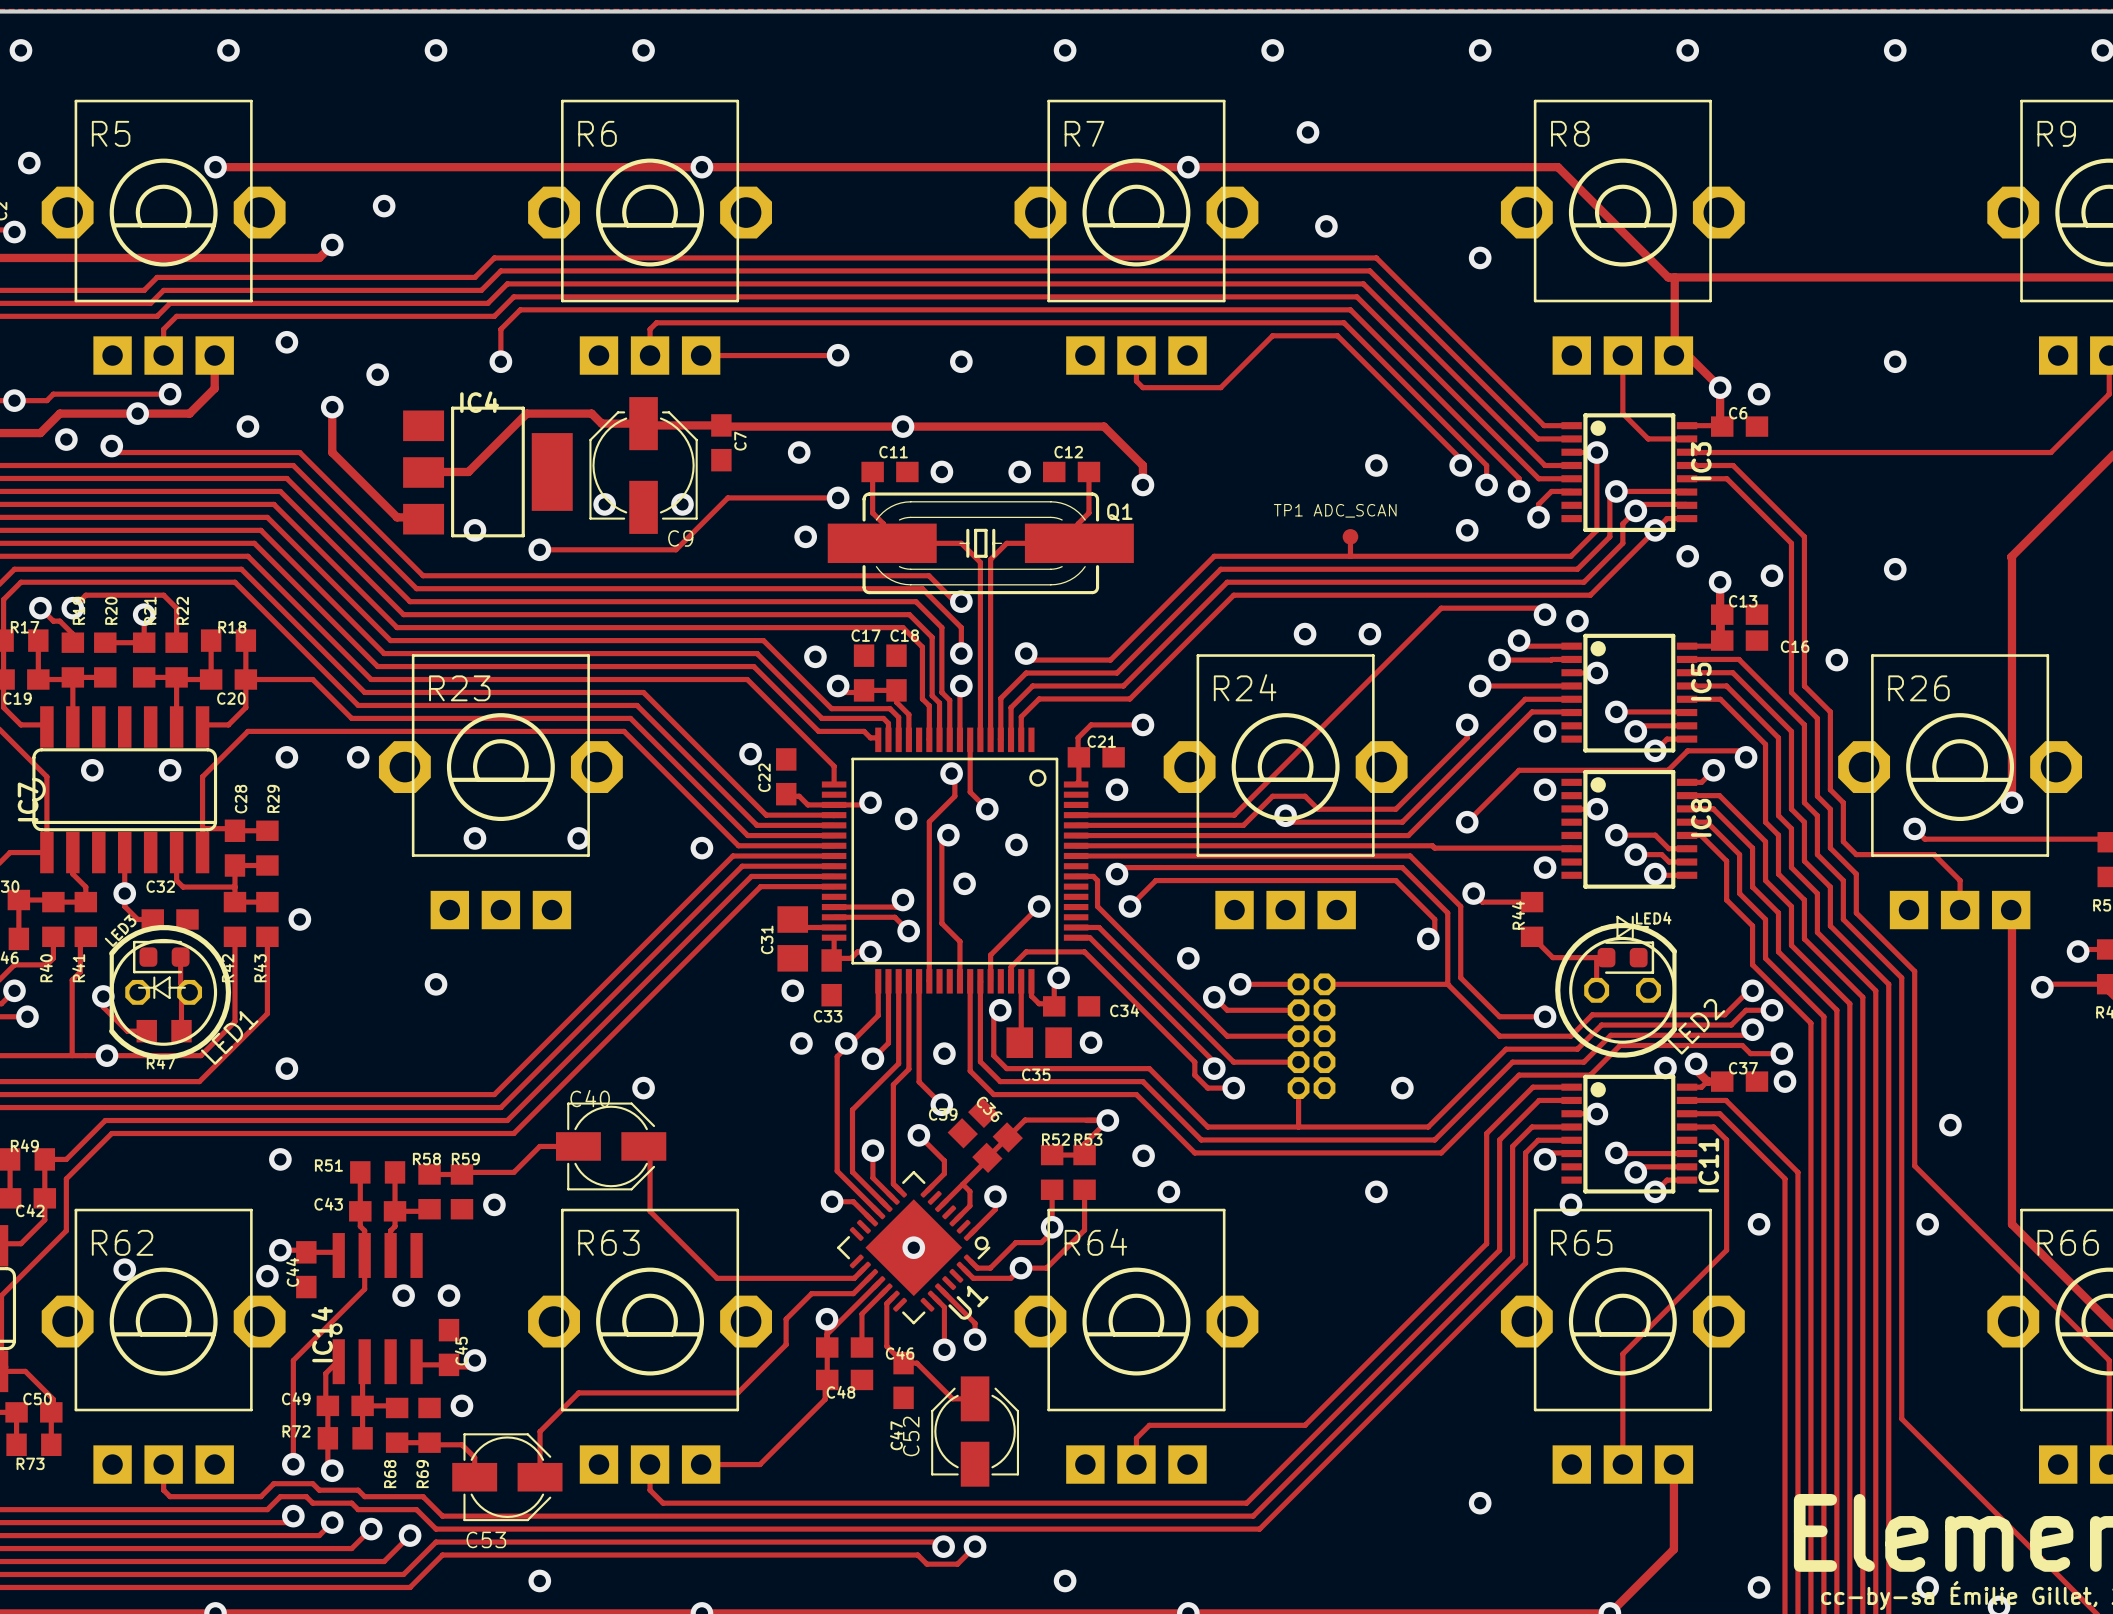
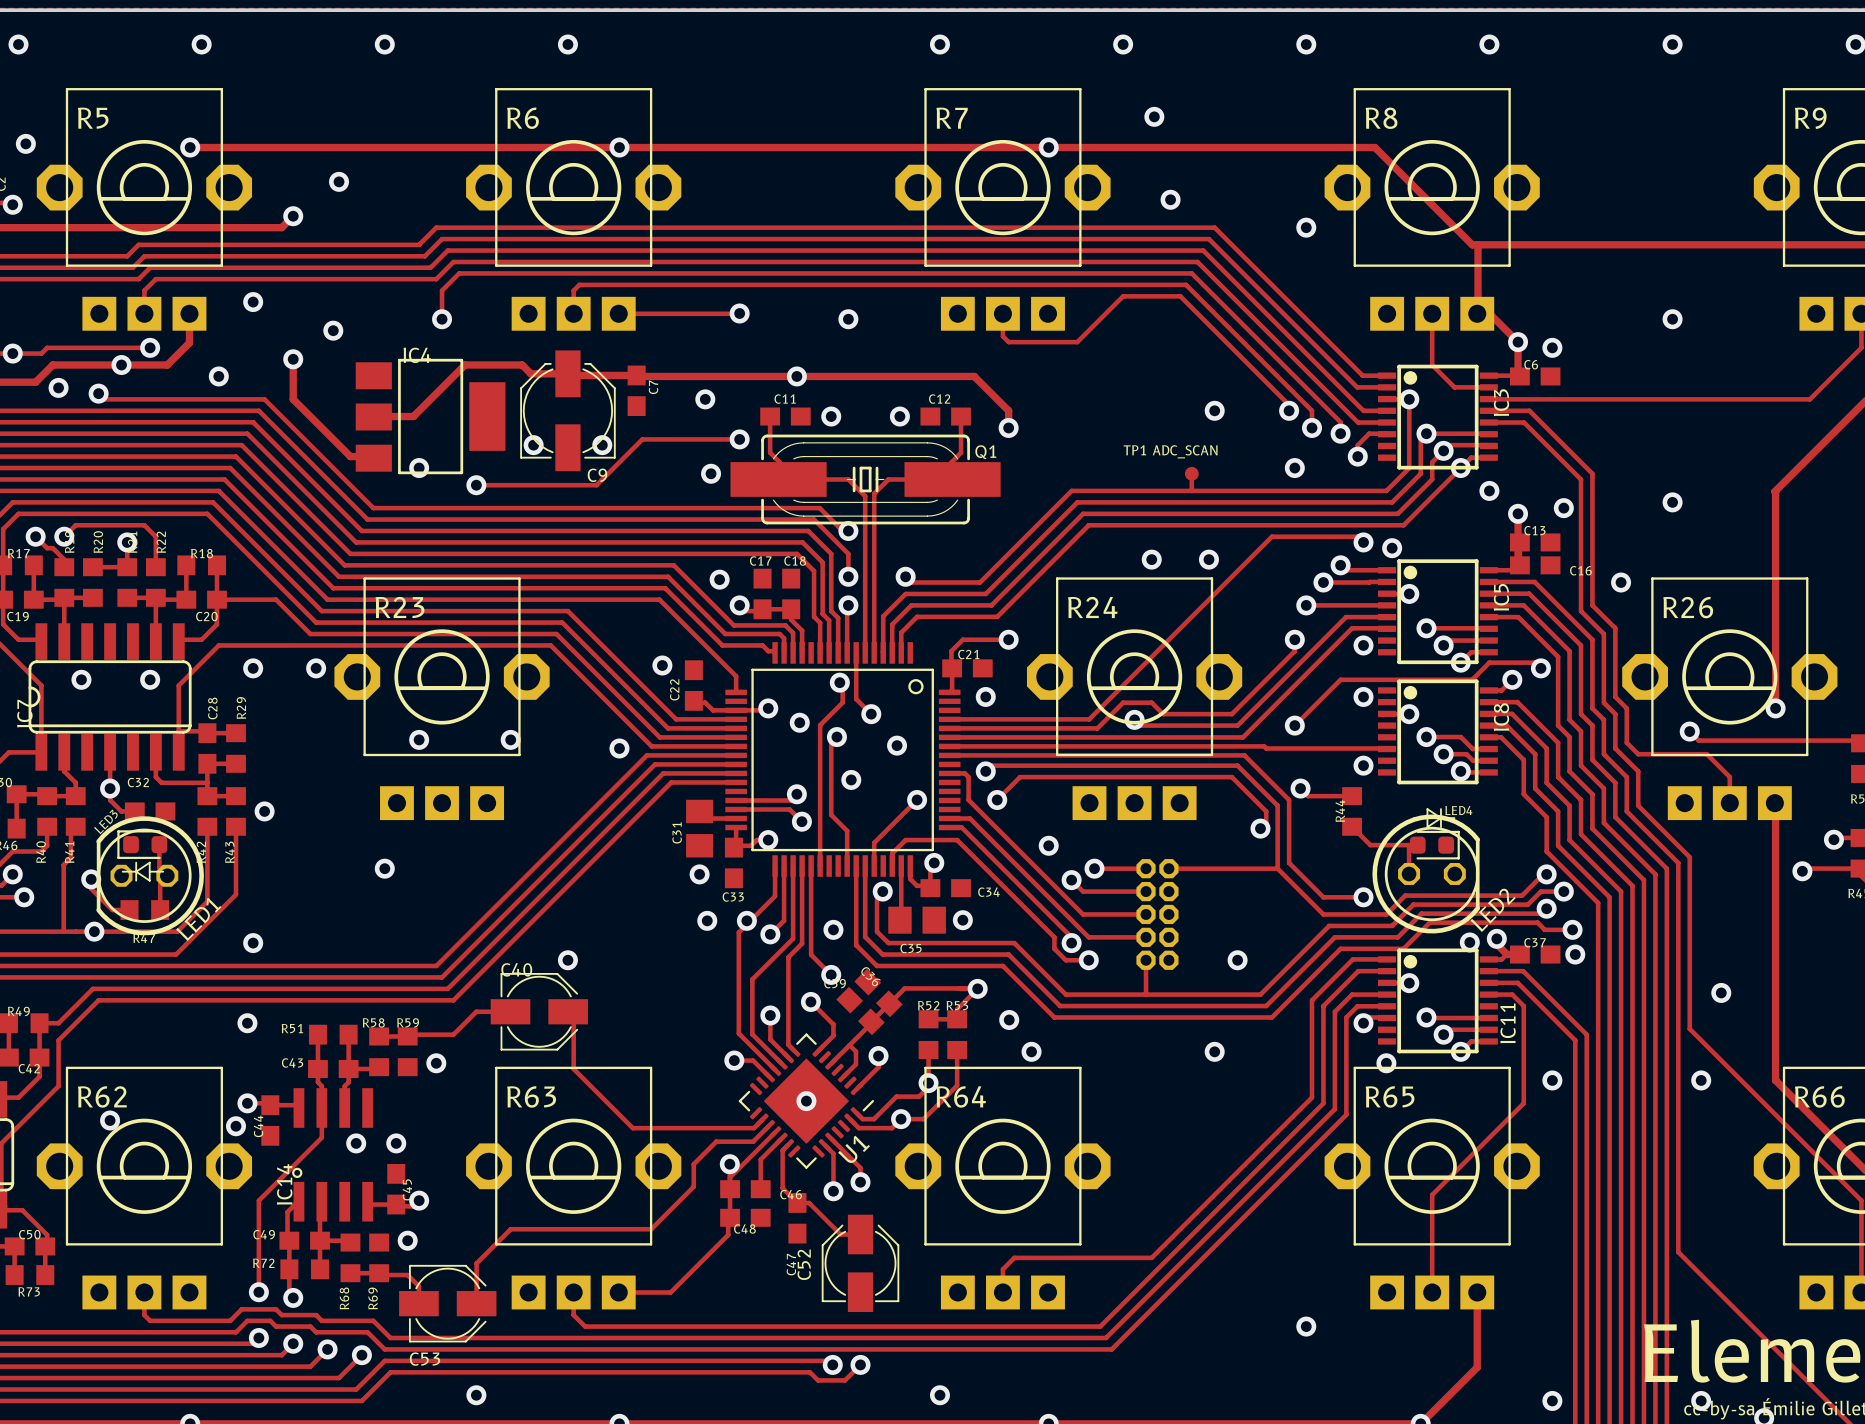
U1 footprint: [837, 1171, 991, 1325] -> [738, 1033, 875, 1169]

